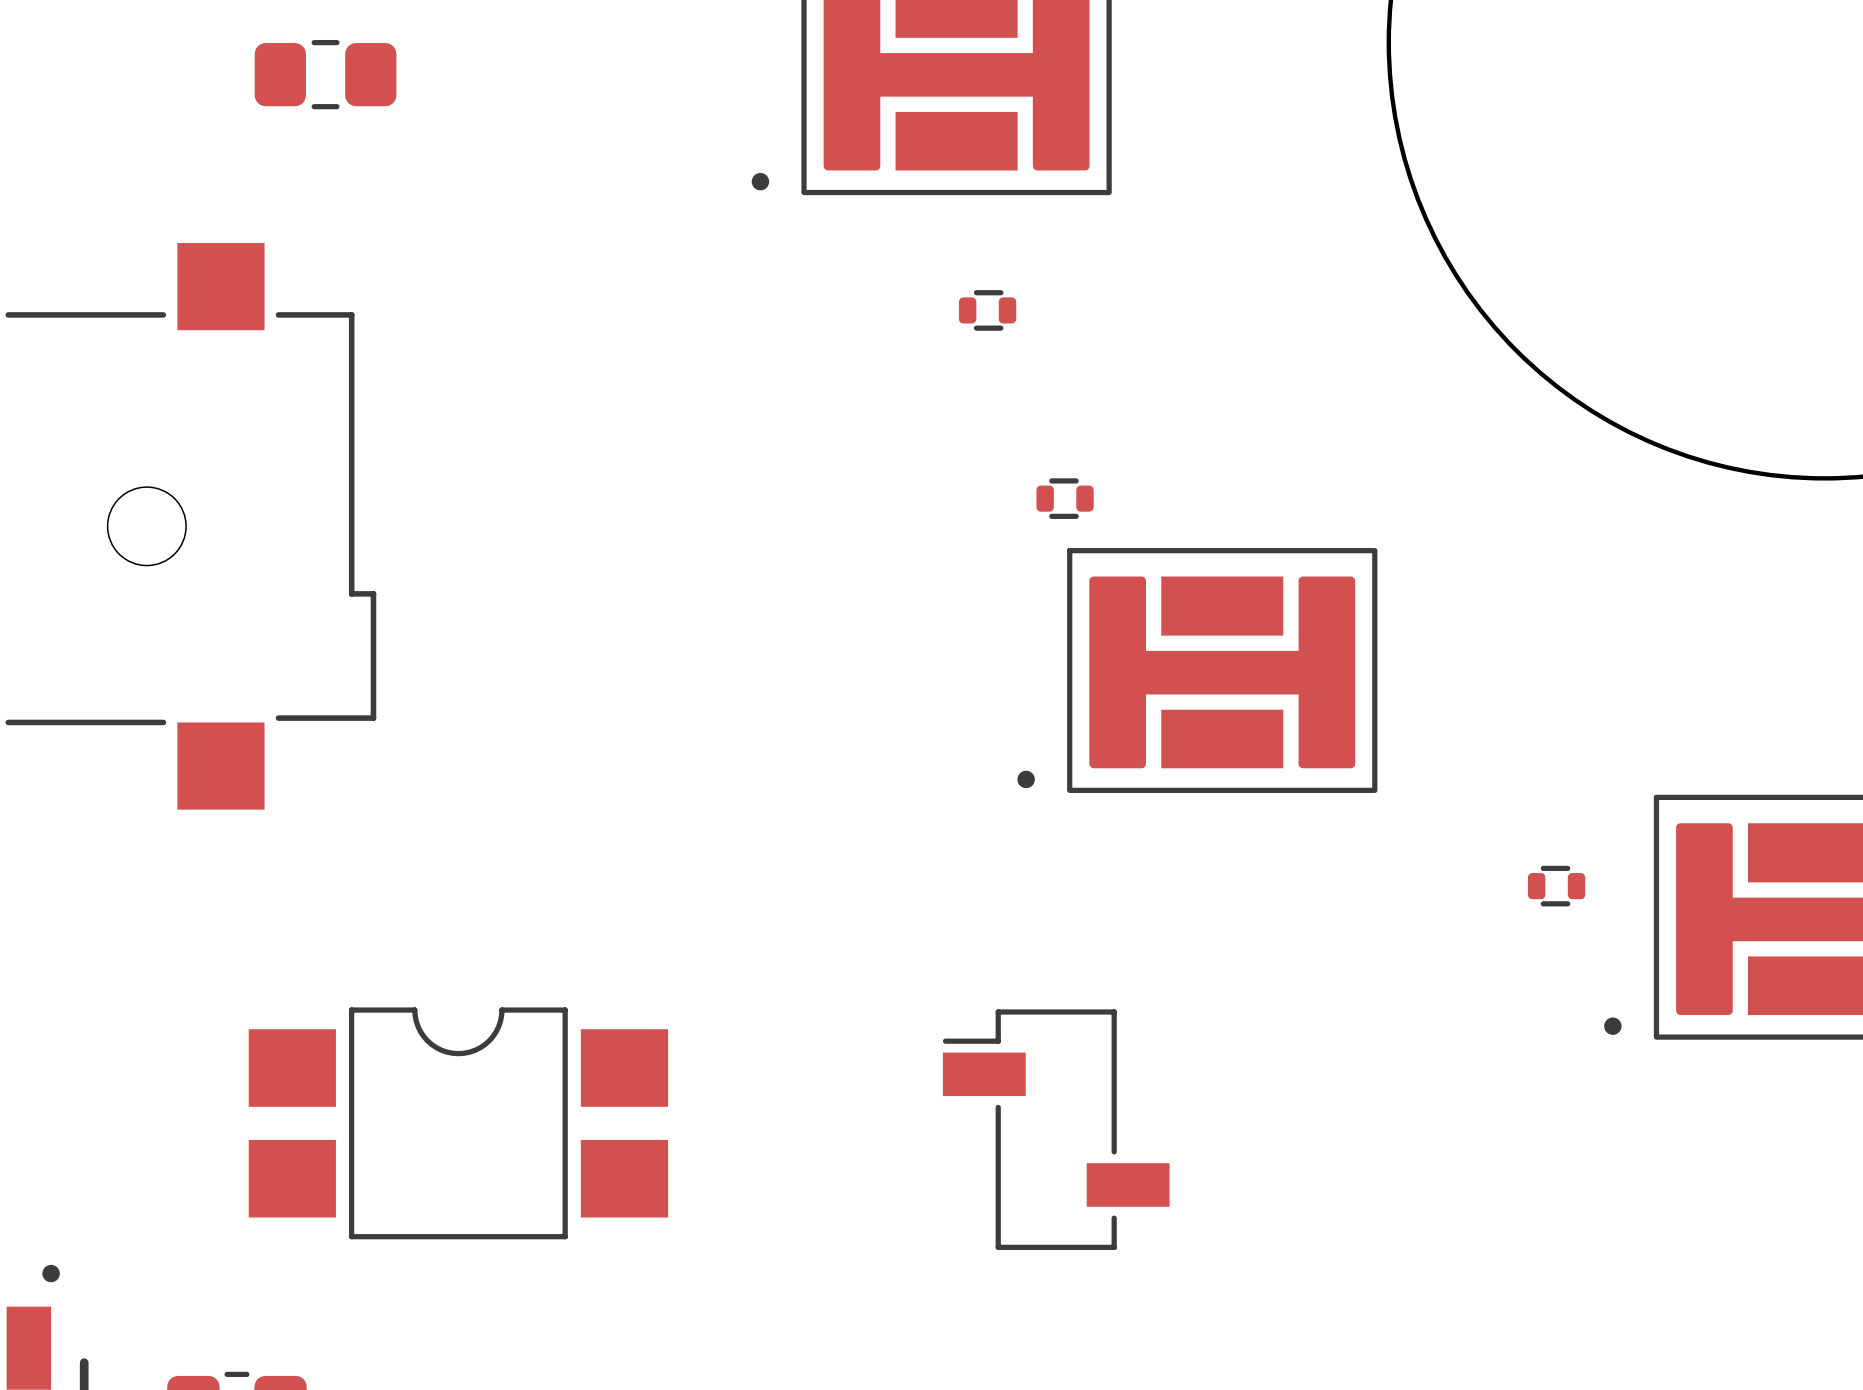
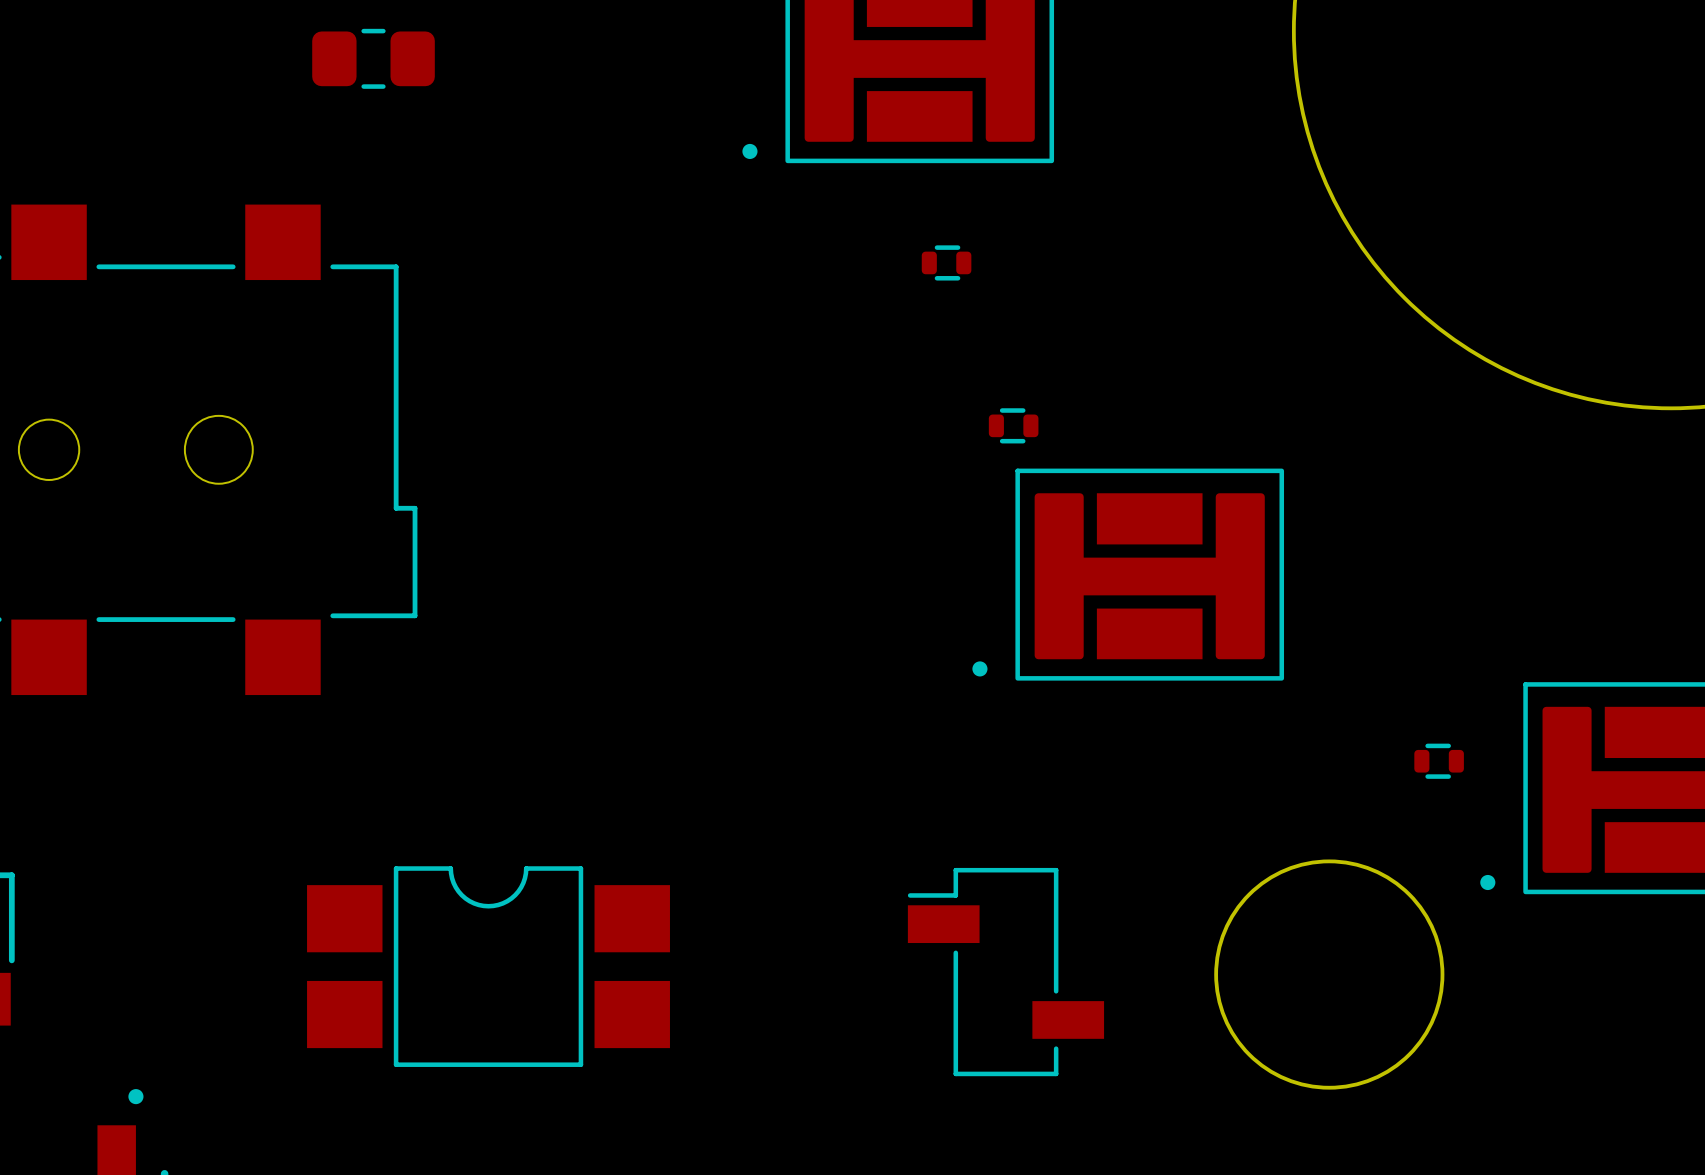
round board edge: none -> [1214, 859, 1445, 1090]

